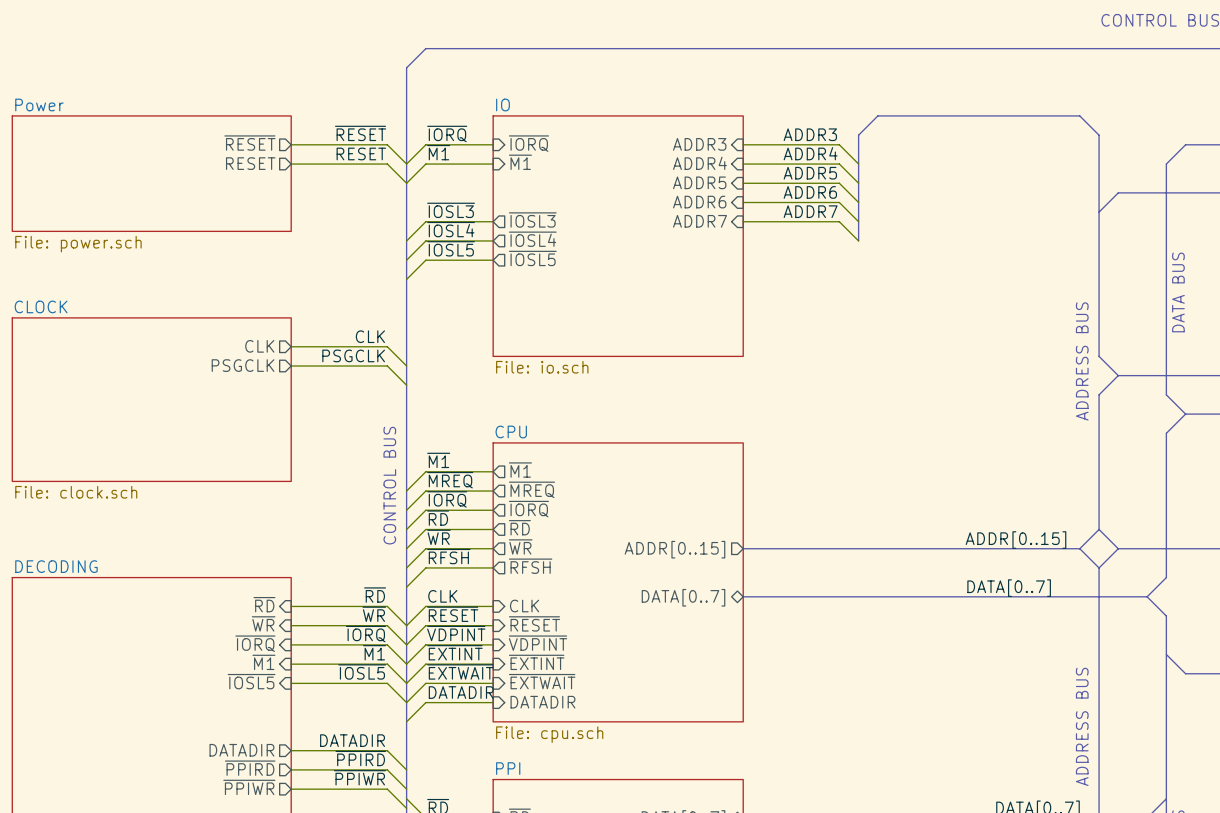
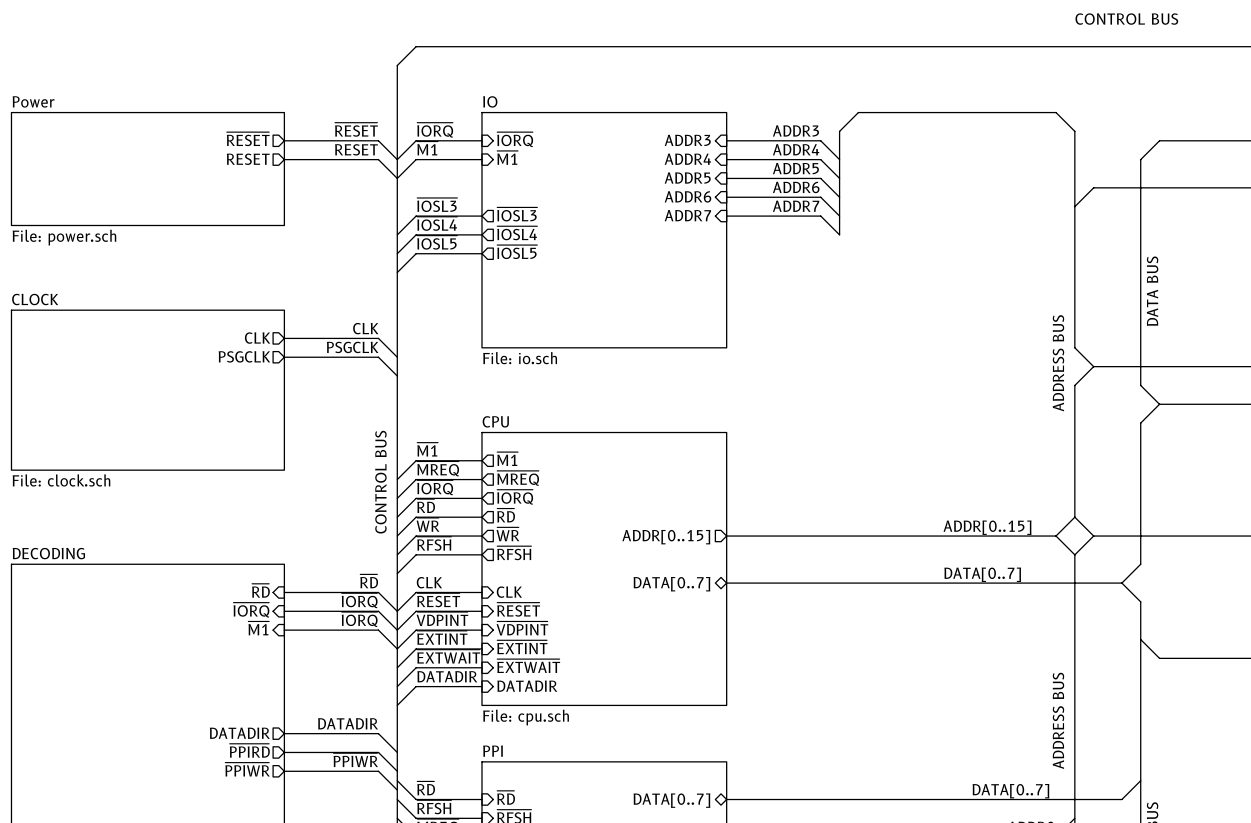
label: ~{WR} (374, 614) -> ~{IORQ} (359, 600)
sheet pin: ~{WR} (263, 623) -> ~{IORQ} (251, 610)
sheet pin: ~{IORQ} (255, 643) -> ~{M1} (258, 628)
label: ~{M1} (374, 652) -> none
sheet pin: ~{M1} (263, 662) -> none
wire: (291, 664) (387, 664) (406, 683) -> none
label: ~{IOSL5} (362, 671) -> none
sheet pin: ~{IOSL5} (251, 681) -> none
wire: (291, 683) (387, 683) (406, 702) -> none
label: ~{PPIRD} (360, 758) -> none

